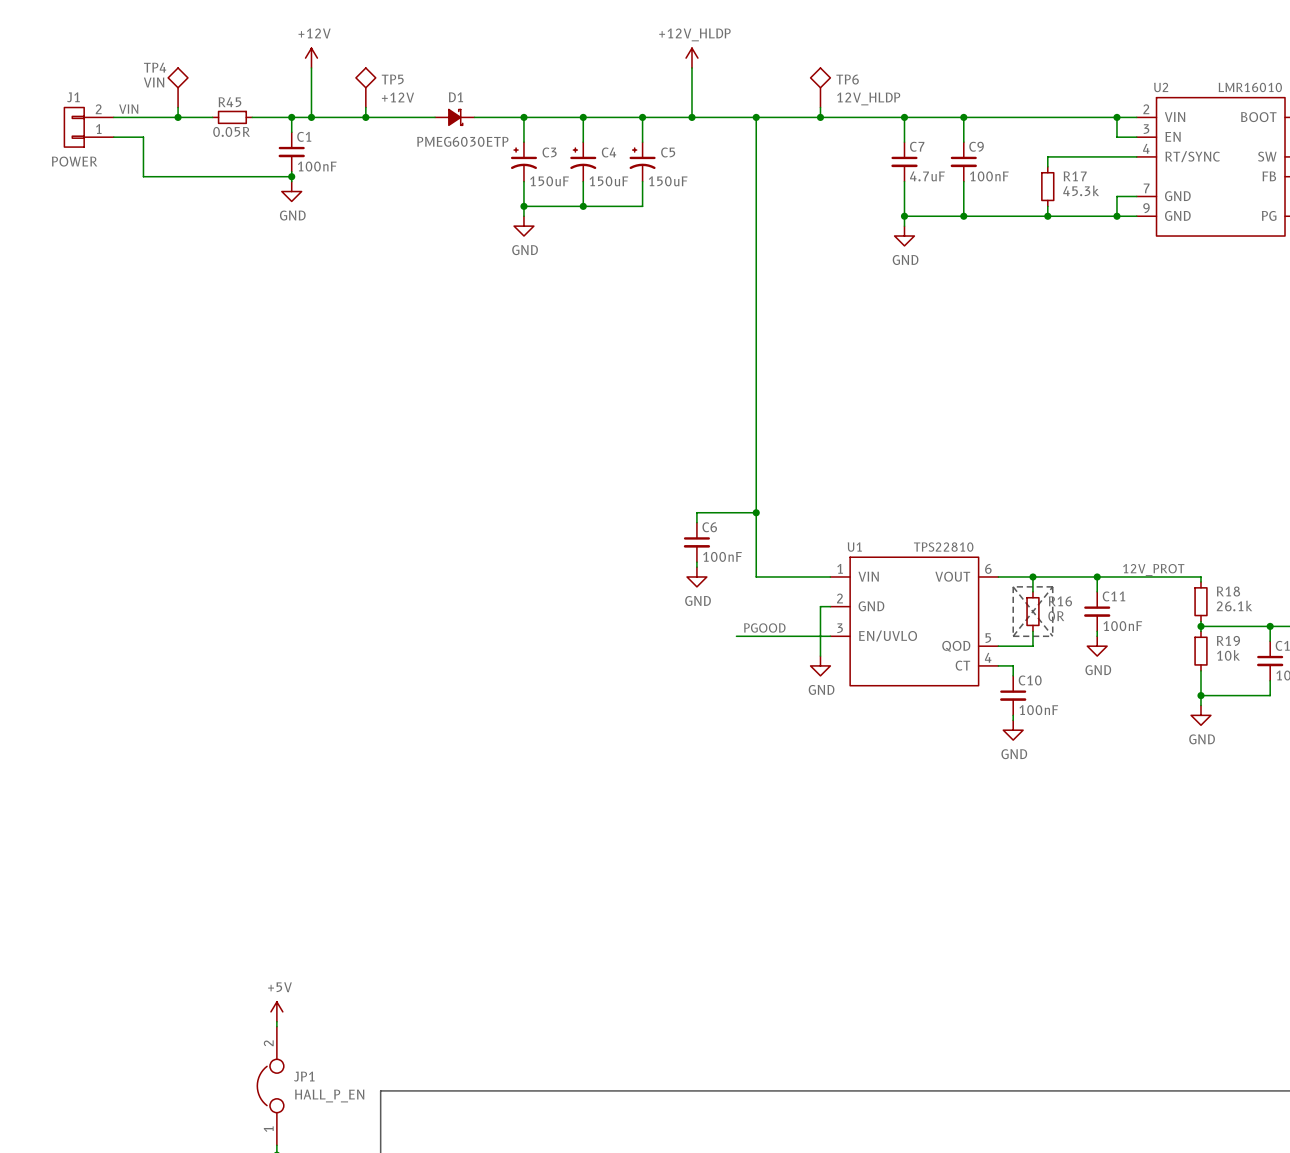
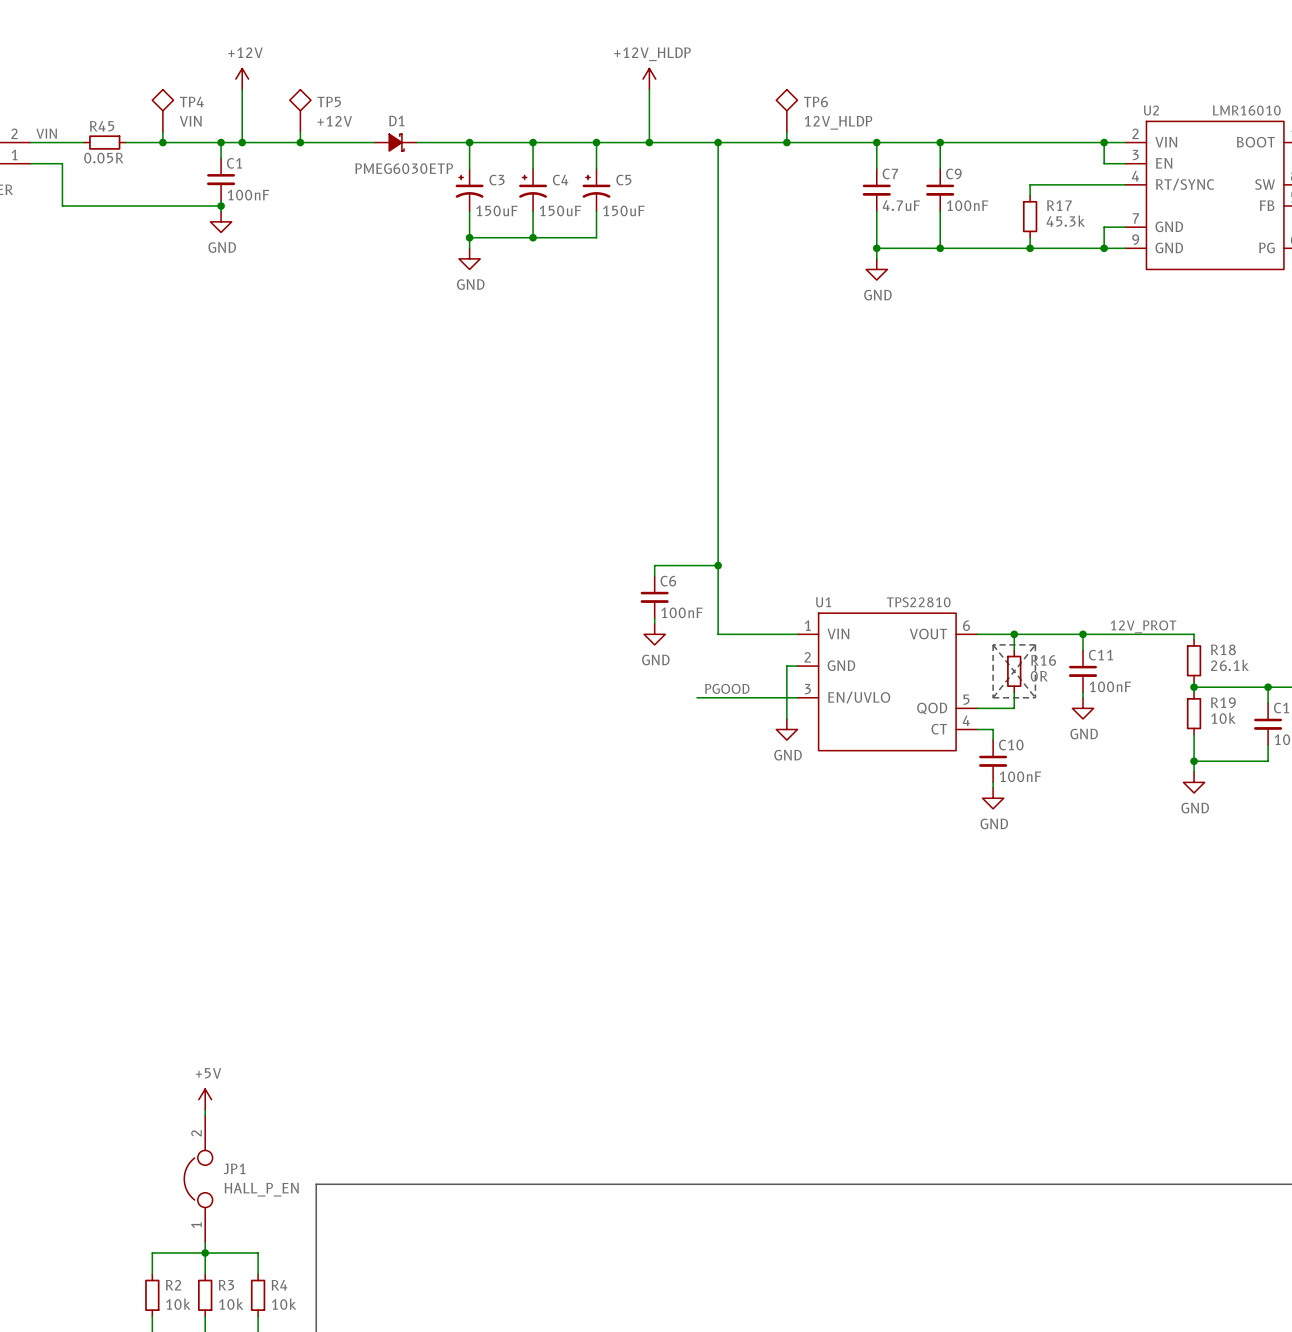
TP4 name position: TP4 (155, 67) -> TP4 (191, 101)
TP4 value position: VIN (154, 82) -> VIN (190, 121)
TP4 position: (178, 87) -> (162, 110)
wire: (178, 107) (178, 117) -> (162, 131) (162, 142)
wire: (163, 117) (202, 117) -> (136, 142) (178, 142)
junction: (178, 117) -> none
R45 position: (232, 117) -> (104, 142)
junction: none -> (162, 142)

